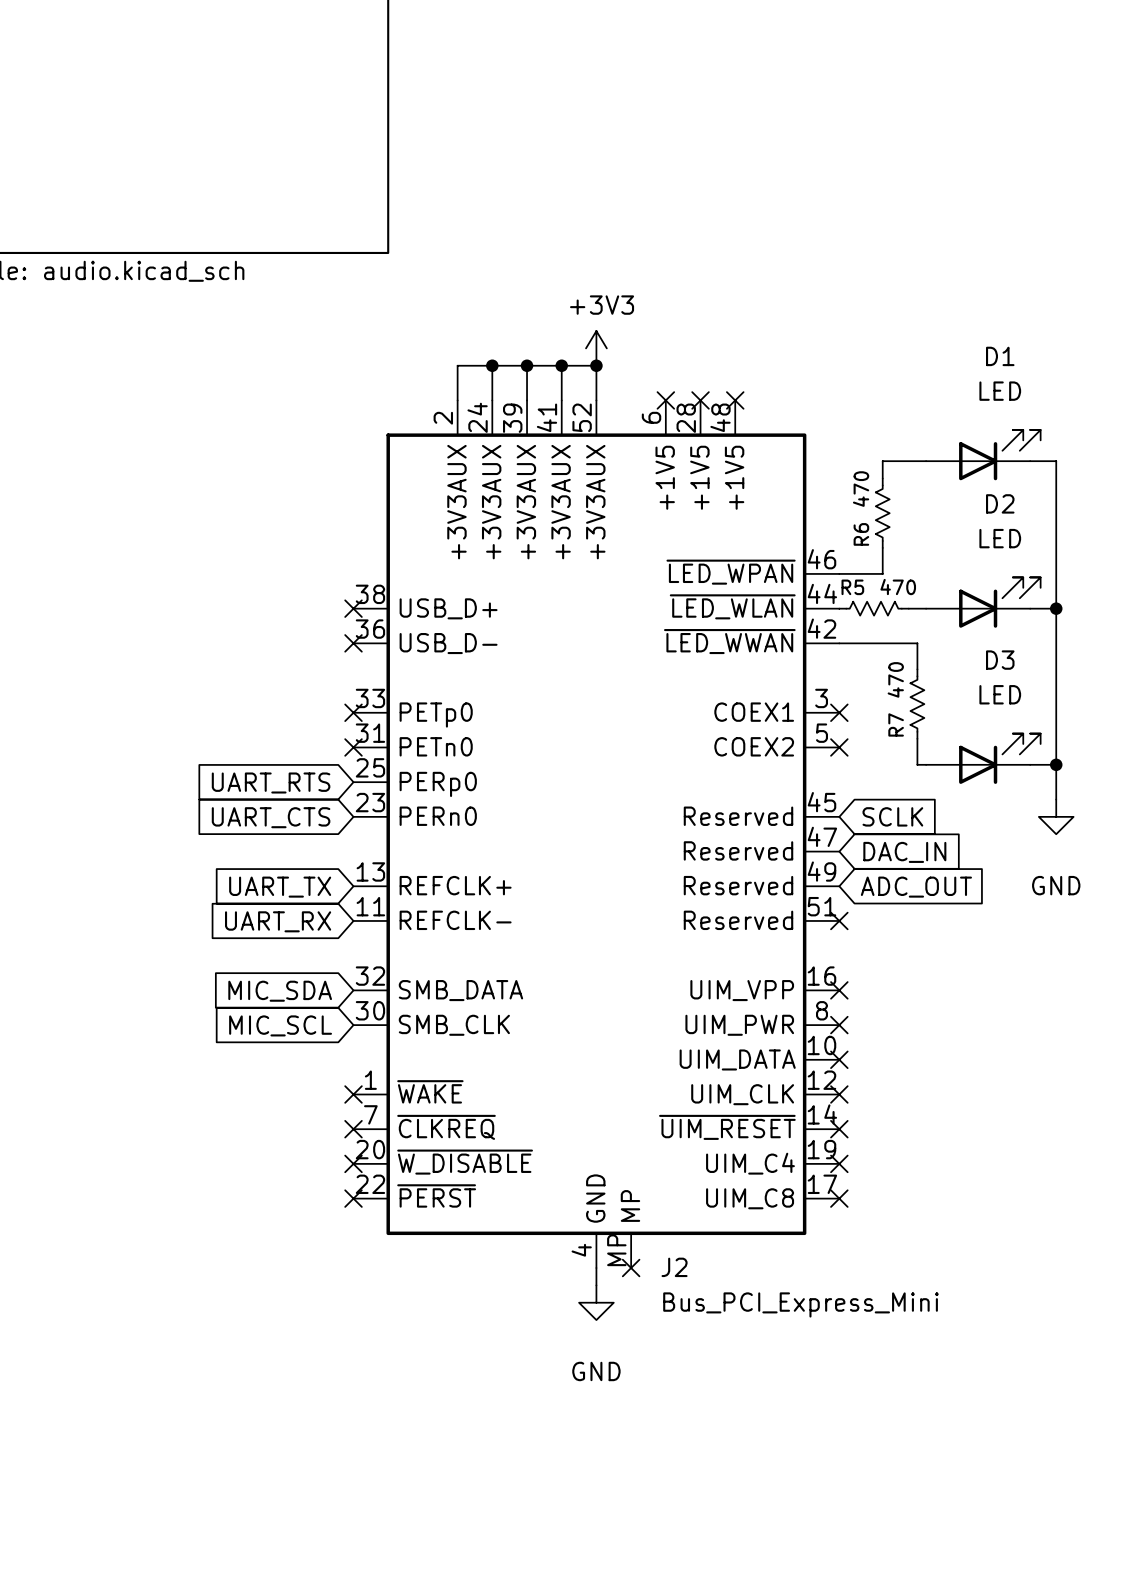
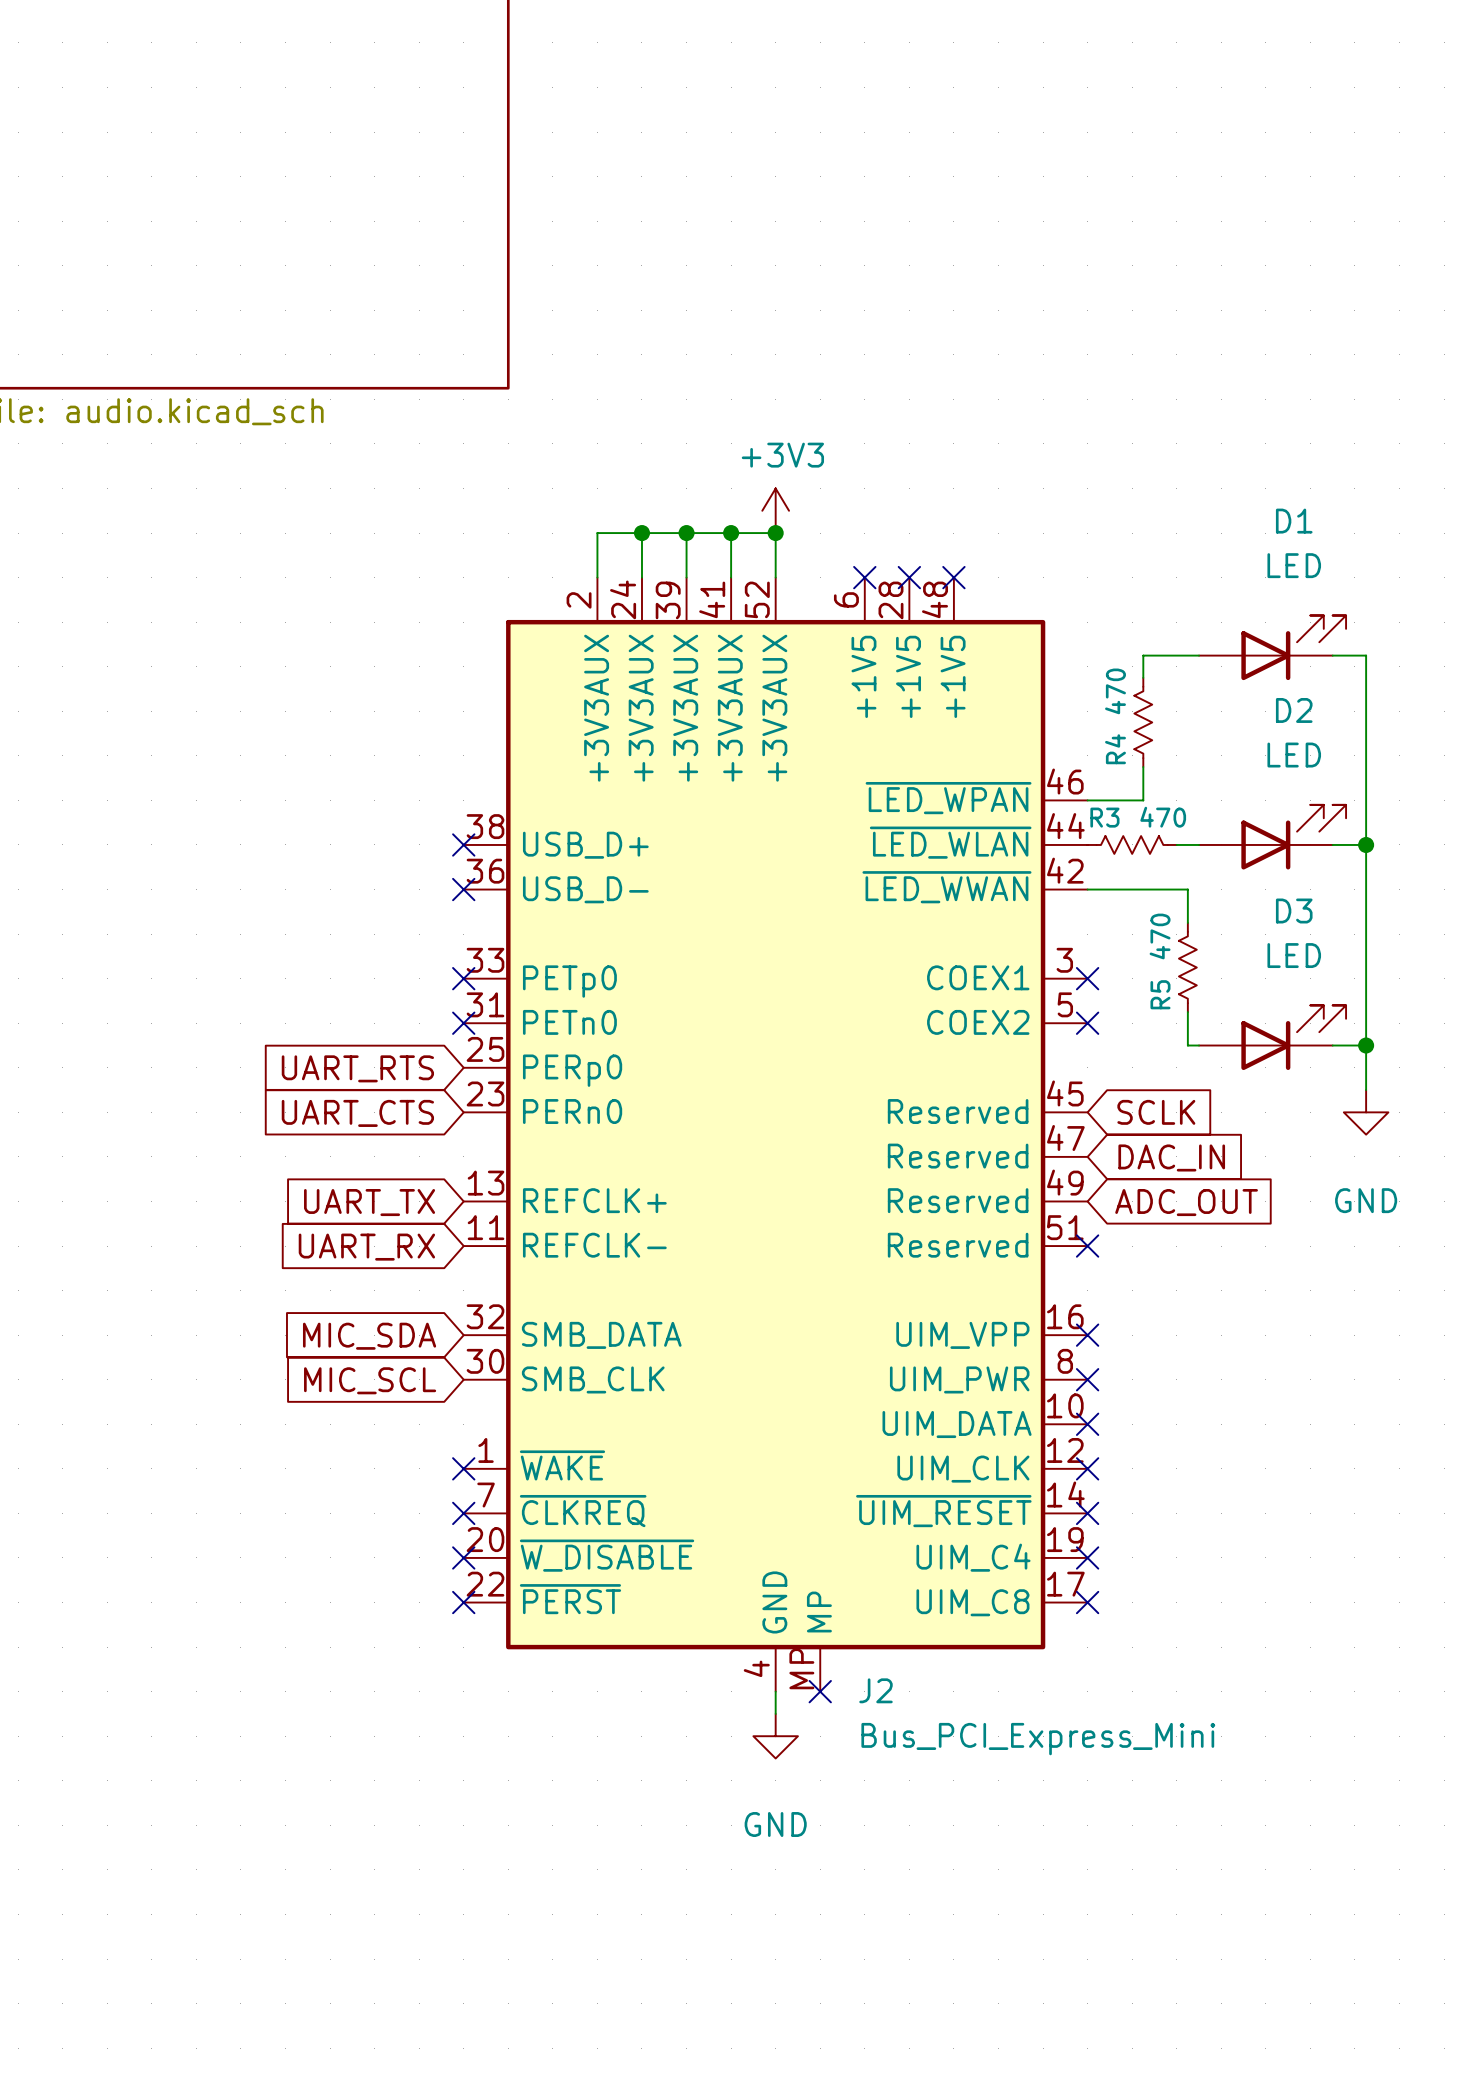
R6 name: R6 (861, 534) -> R4 (1115, 749)
R5 name: R5 (852, 587) -> R3 (1104, 817)
R7 name: R7 (896, 724) -> R5 (1160, 994)

